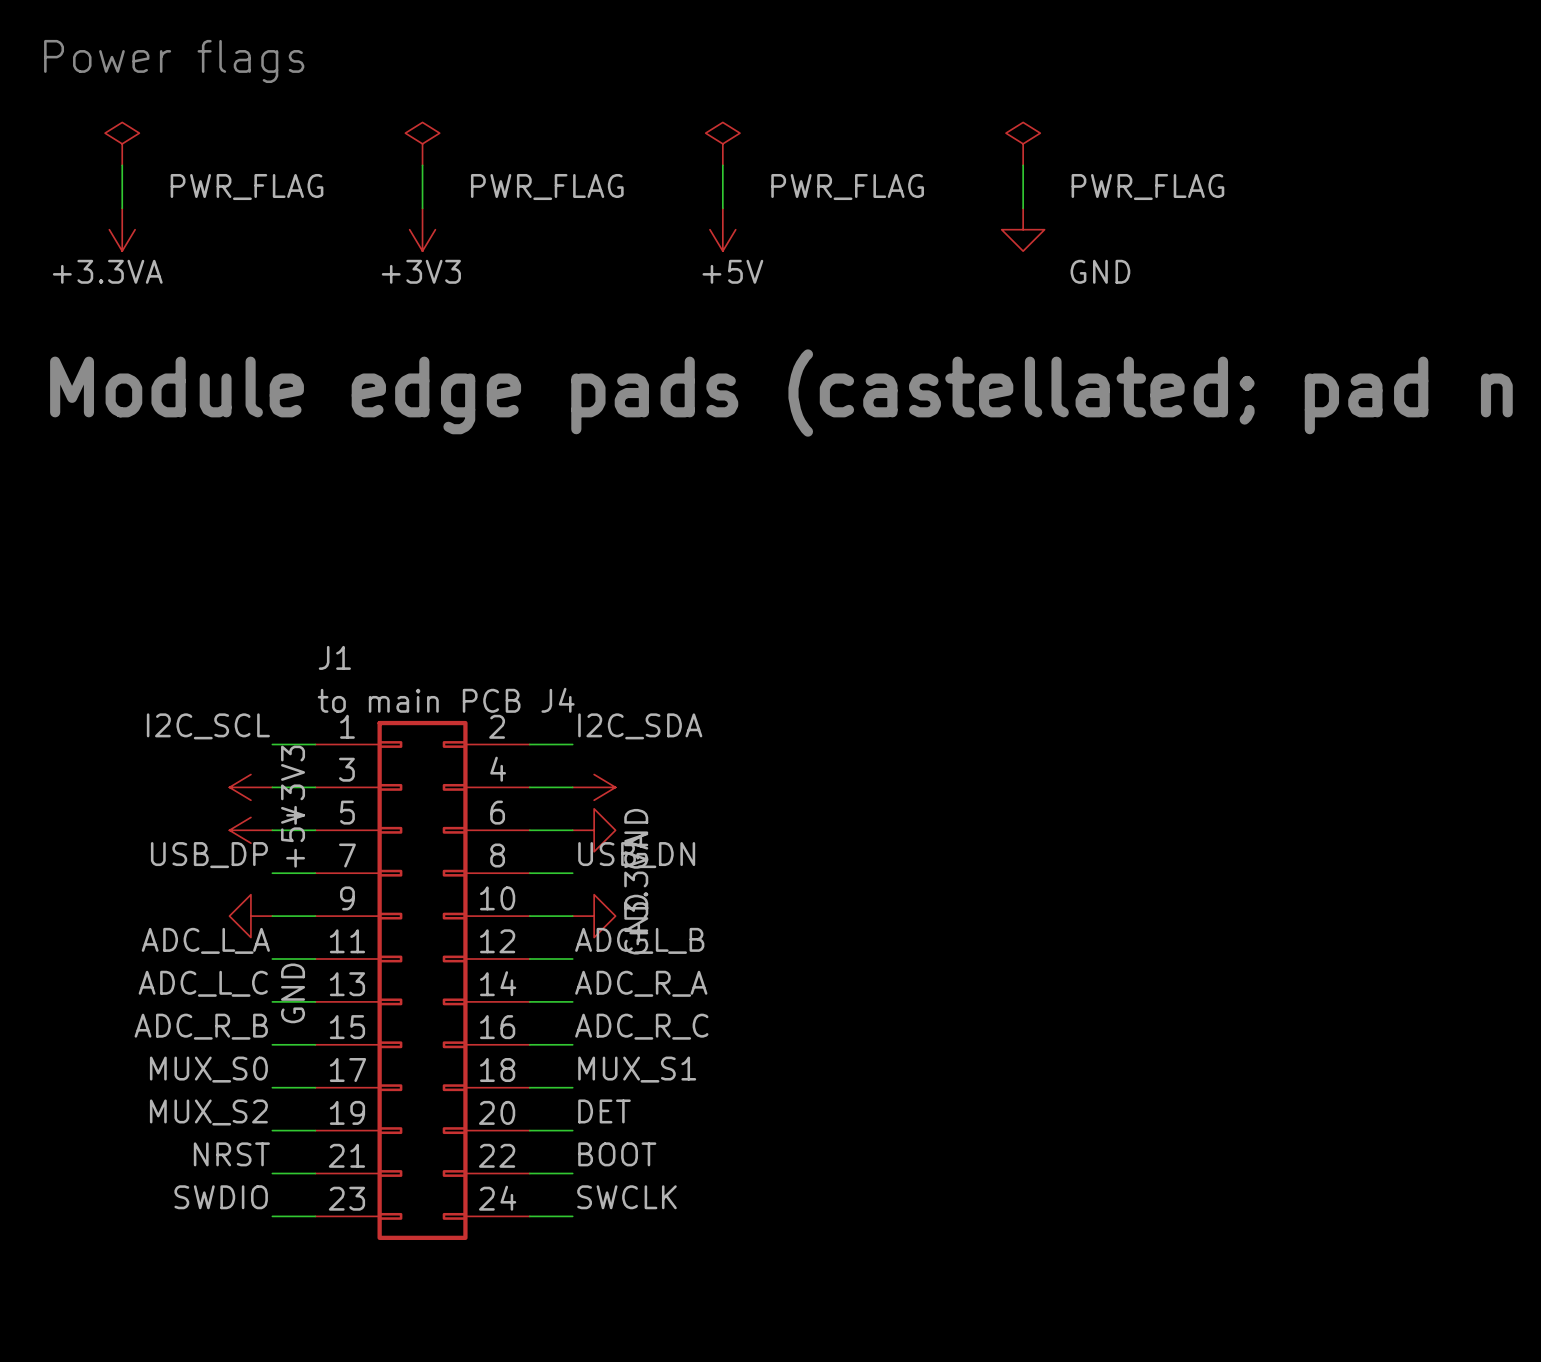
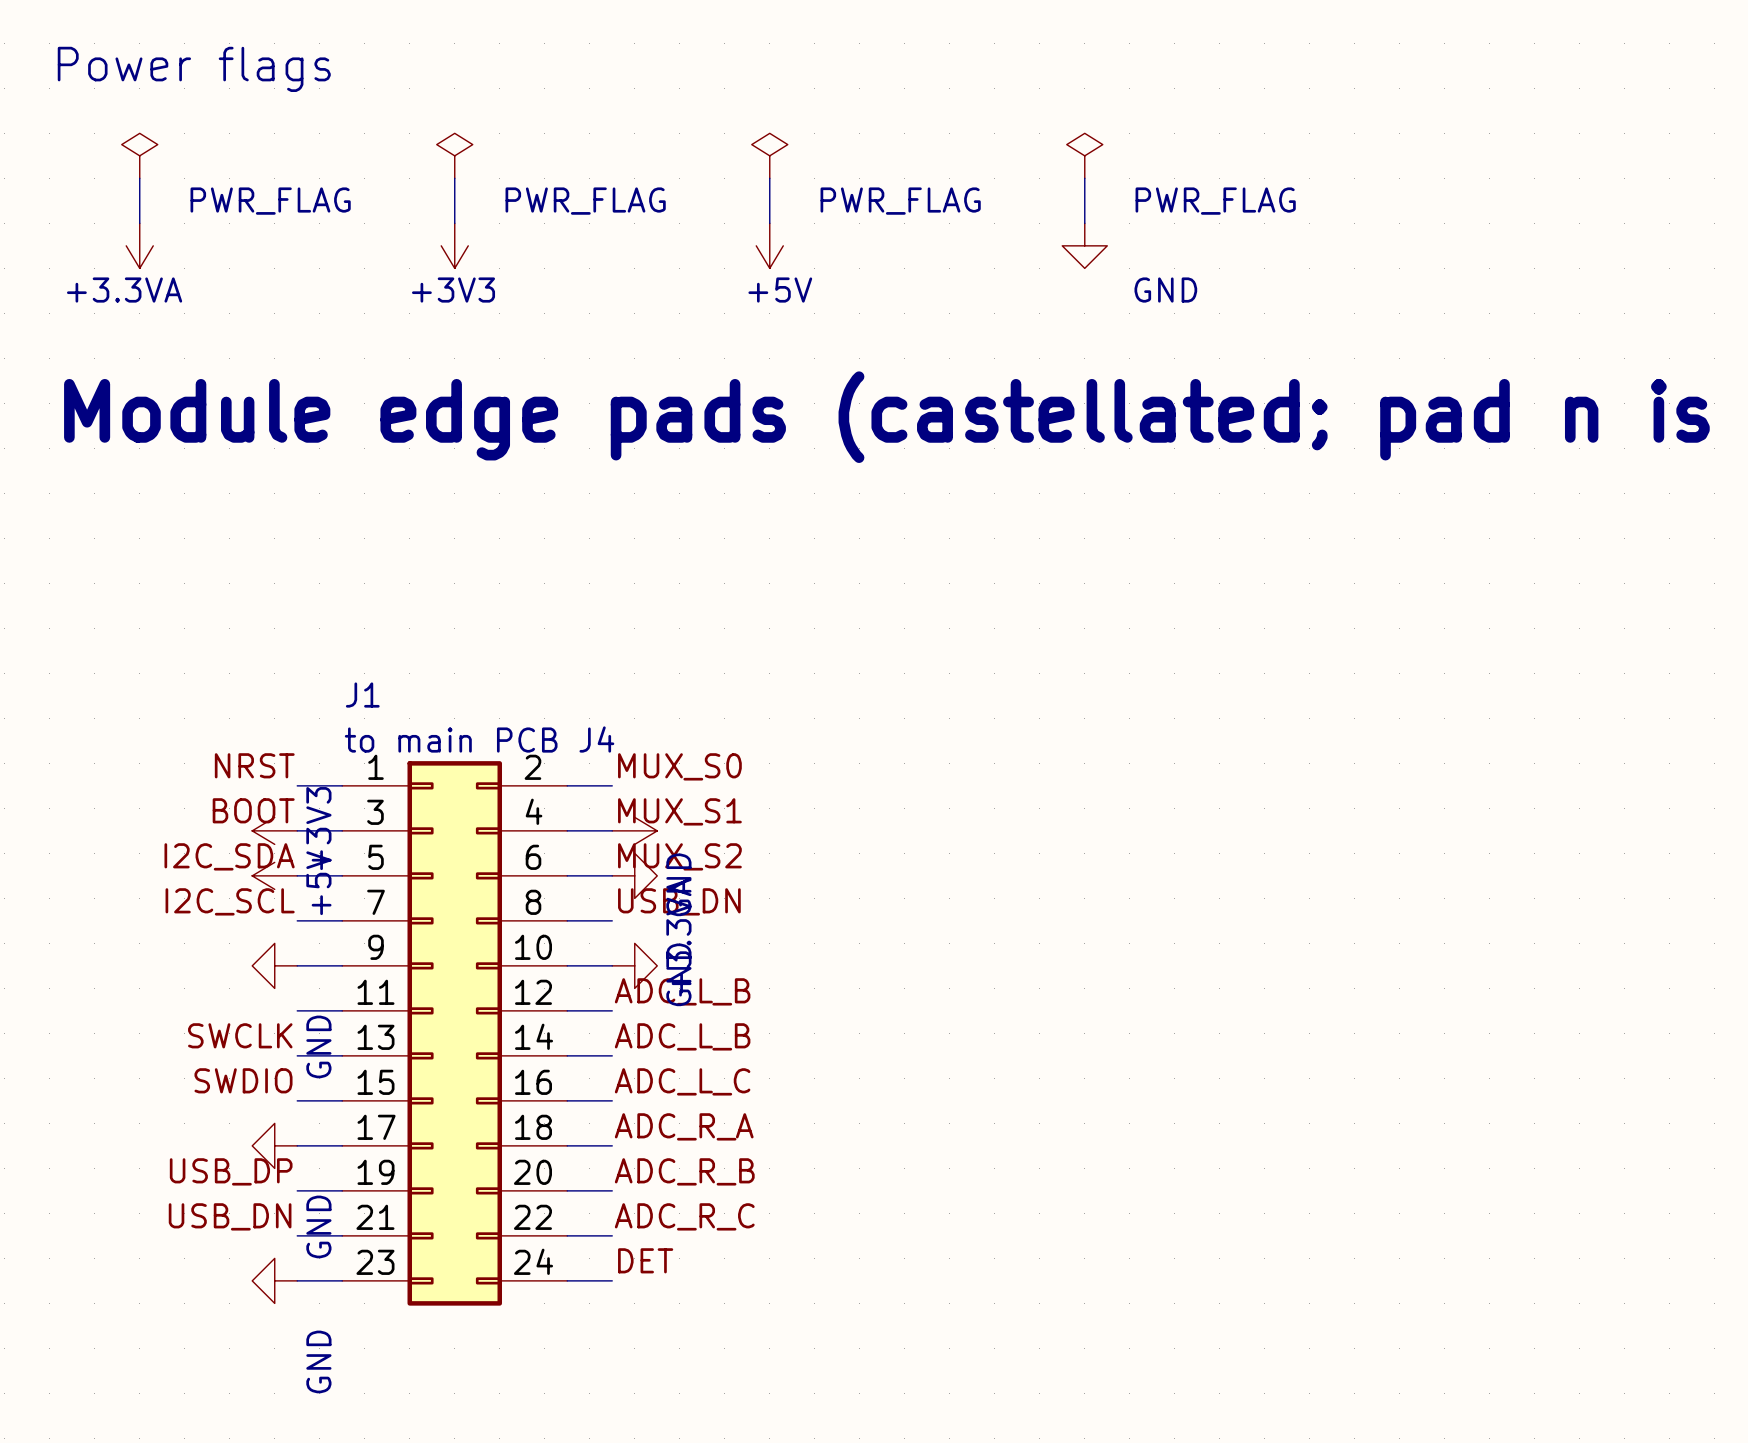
label: I2C_SCL (208, 726) -> NRST (254, 765)
label: I2C_SDA (640, 726) -> MUX_S0 (679, 766)
label: none -> BOOT (253, 810)
label: none -> MUX_S1 (679, 811)
label: none -> I2C_SDA (229, 856)
label: none -> MUX_S2 (679, 856)
label: USB_DP (209, 855) -> I2C_SCL (230, 901)
label: ADC_L_A (205, 940) -> none
label: ADC_L_C (203, 983) -> SWCLK (240, 1035)
label: ADC_R_A (641, 983) -> ADC_L_B (682, 1036)
label: ADC_R_B (201, 1026) -> SWDIO (243, 1080)
label: ADC_R_C (641, 1026) -> ADC_L_C (682, 1081)
label: MUX_S0 (208, 1069) -> none
label: MUX_S1 (637, 1069) -> ADC_R_A (684, 1126)
power symbol: none -> GND (274, 1145)
label: DET (604, 1111) -> ADC_R_B (684, 1171)
label: MUX_S2 (208, 1112) -> USB_DP (231, 1171)
label: NRST (231, 1154) -> USB_DN (230, 1216)
label: BOOT (617, 1154) -> ADC_R_C (684, 1216)
label: SWDIO (221, 1197) -> none
label: SWCLK (626, 1197) -> DET (645, 1260)
power symbol: none -> GND (274, 1280)

